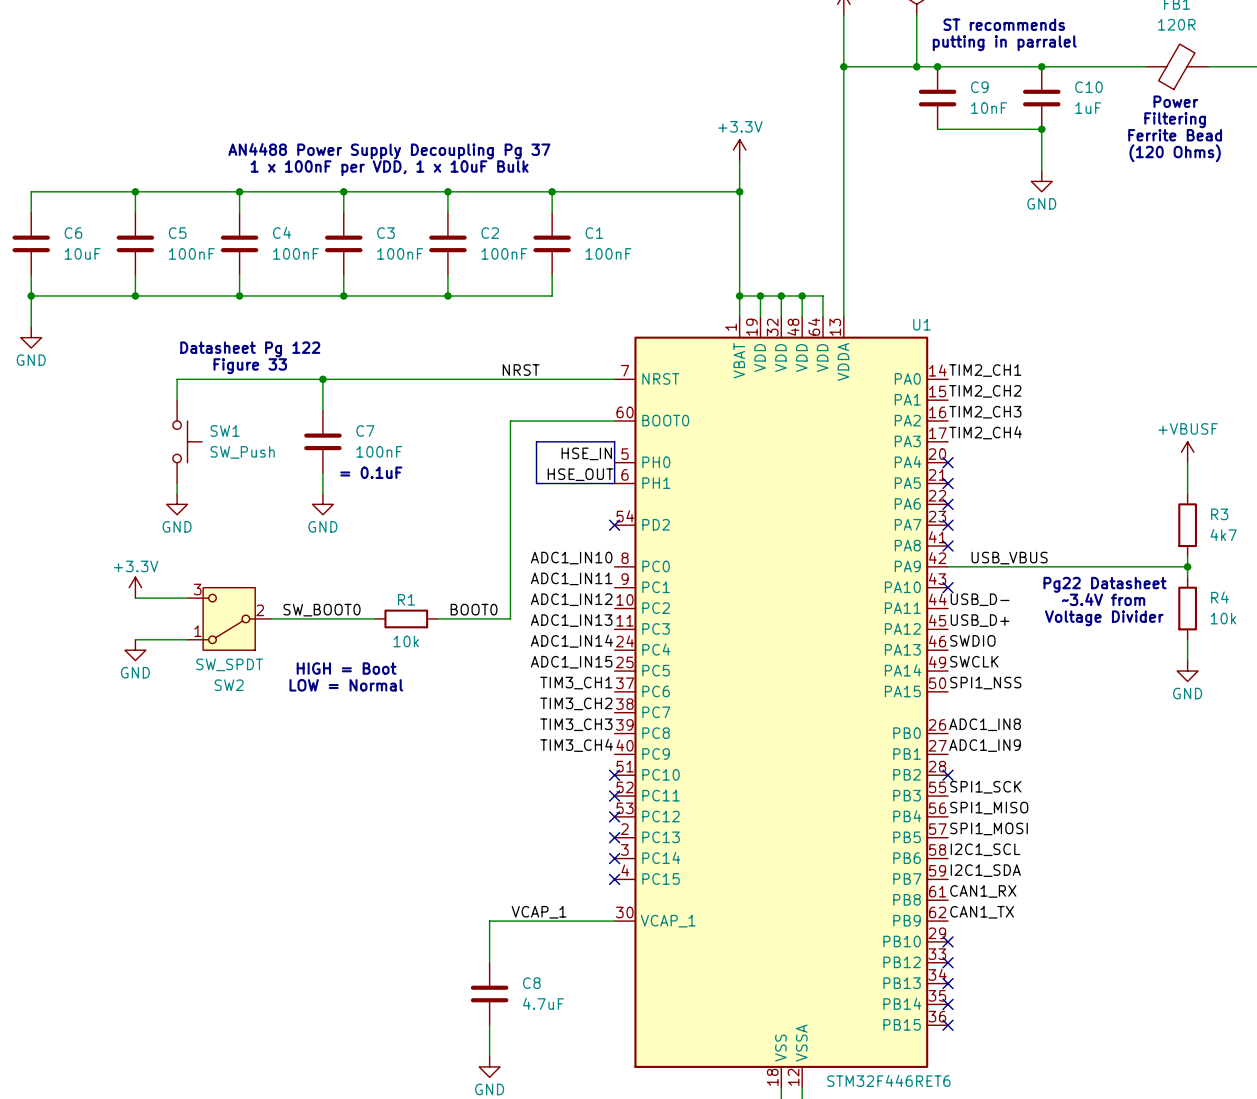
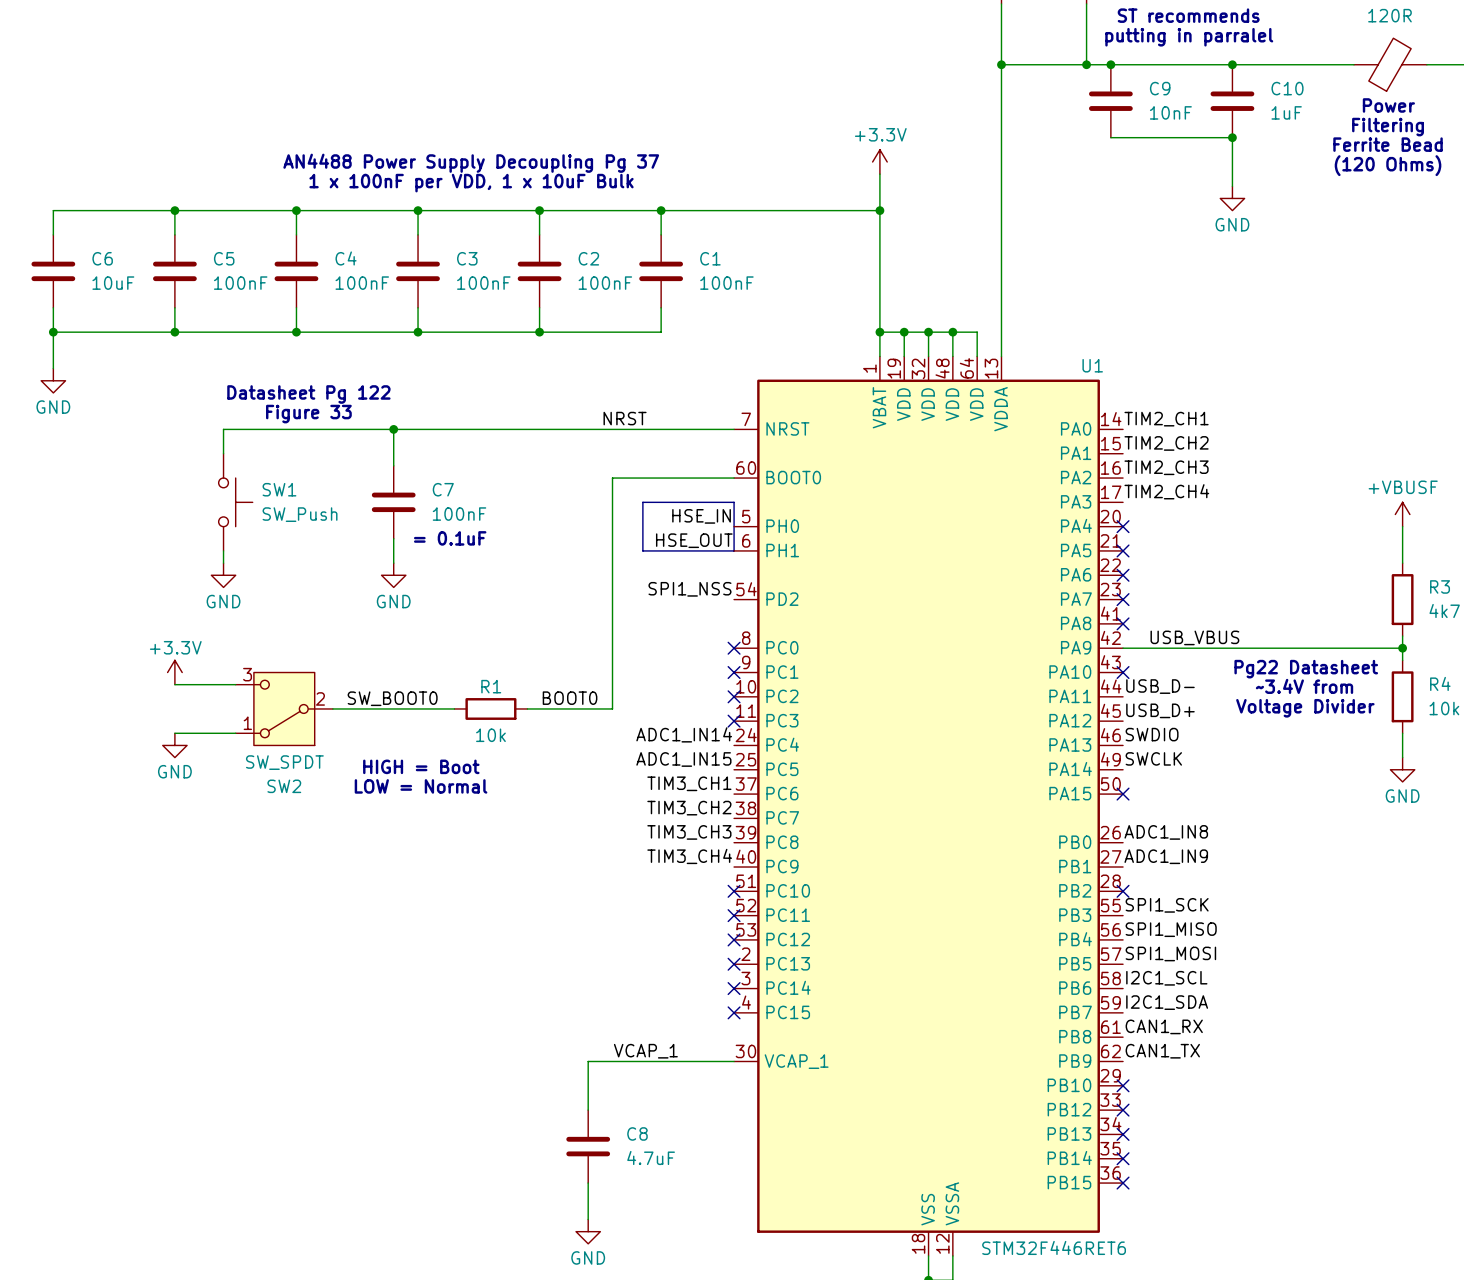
label: none -> SPI1_NSS (689, 589)
no-connect mark: (614, 525) -> none
label: ADC1_IN10 (571, 558) -> none
no-connect mark: none -> (734, 648)
label: ADC1_IN11 (571, 578) -> none
no-connect mark: none -> (734, 672)
label: ADC1_IN12 (571, 599) -> none
no-connect mark: none -> (734, 696)
label: ADC1_IN13 (571, 620) -> none
no-connect mark: none -> (734, 721)
label: SPI1_NSS (985, 683) -> none
no-connect mark: none -> (1123, 794)

